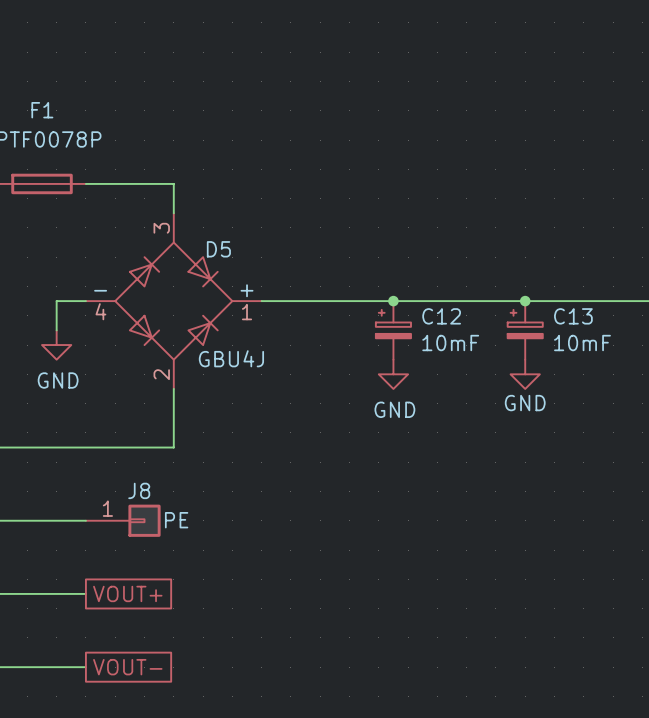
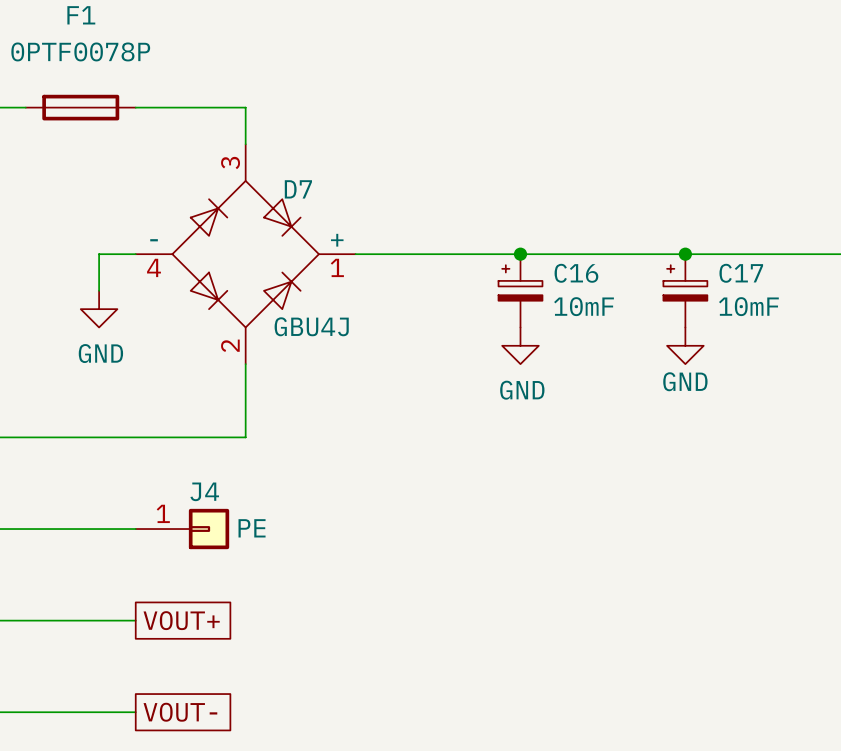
D5 name: D5 (218, 249) -> D7 (298, 189)
C12 name: C12 (441, 316) -> C16 (576, 273)
C13 name: C13 (573, 316) -> C17 (741, 273)
J8 name: J8 (139, 490) -> J4 (204, 491)

